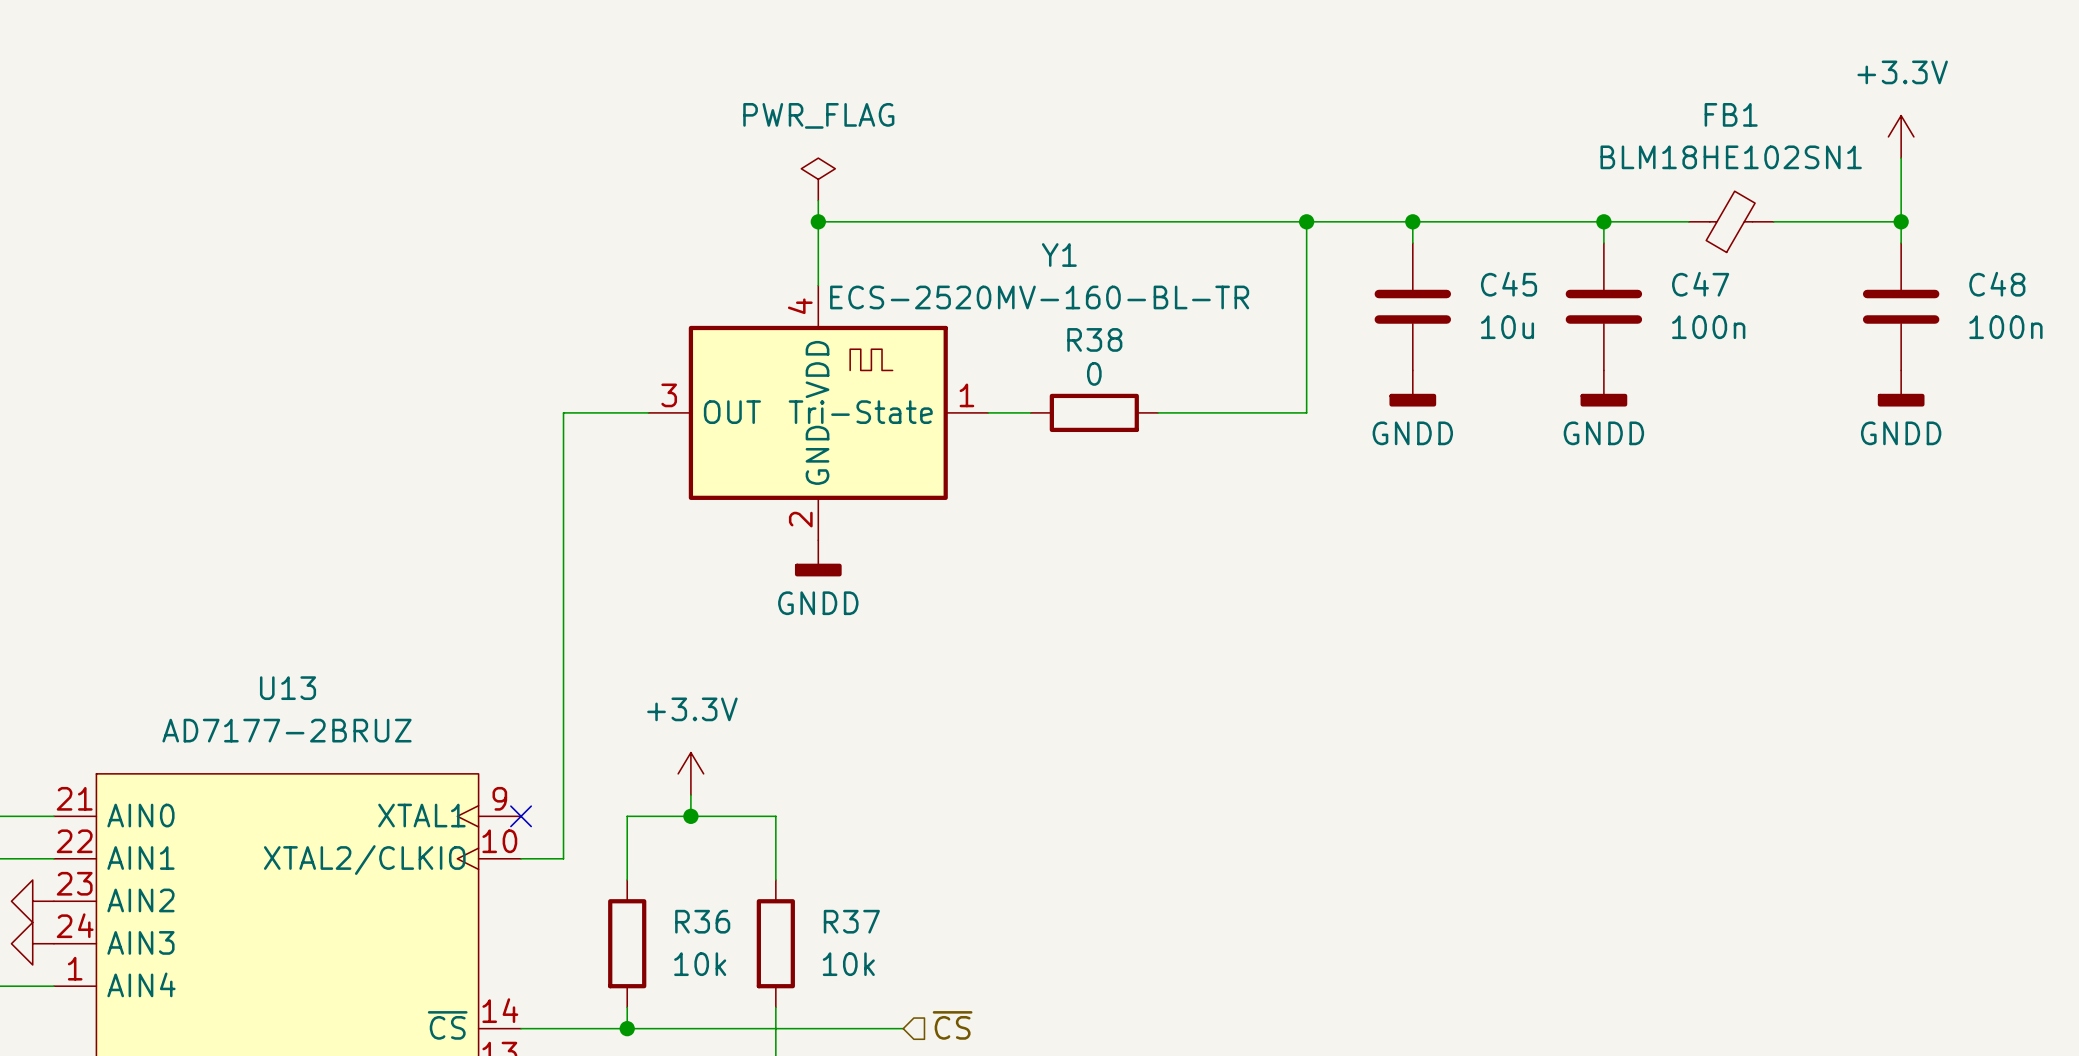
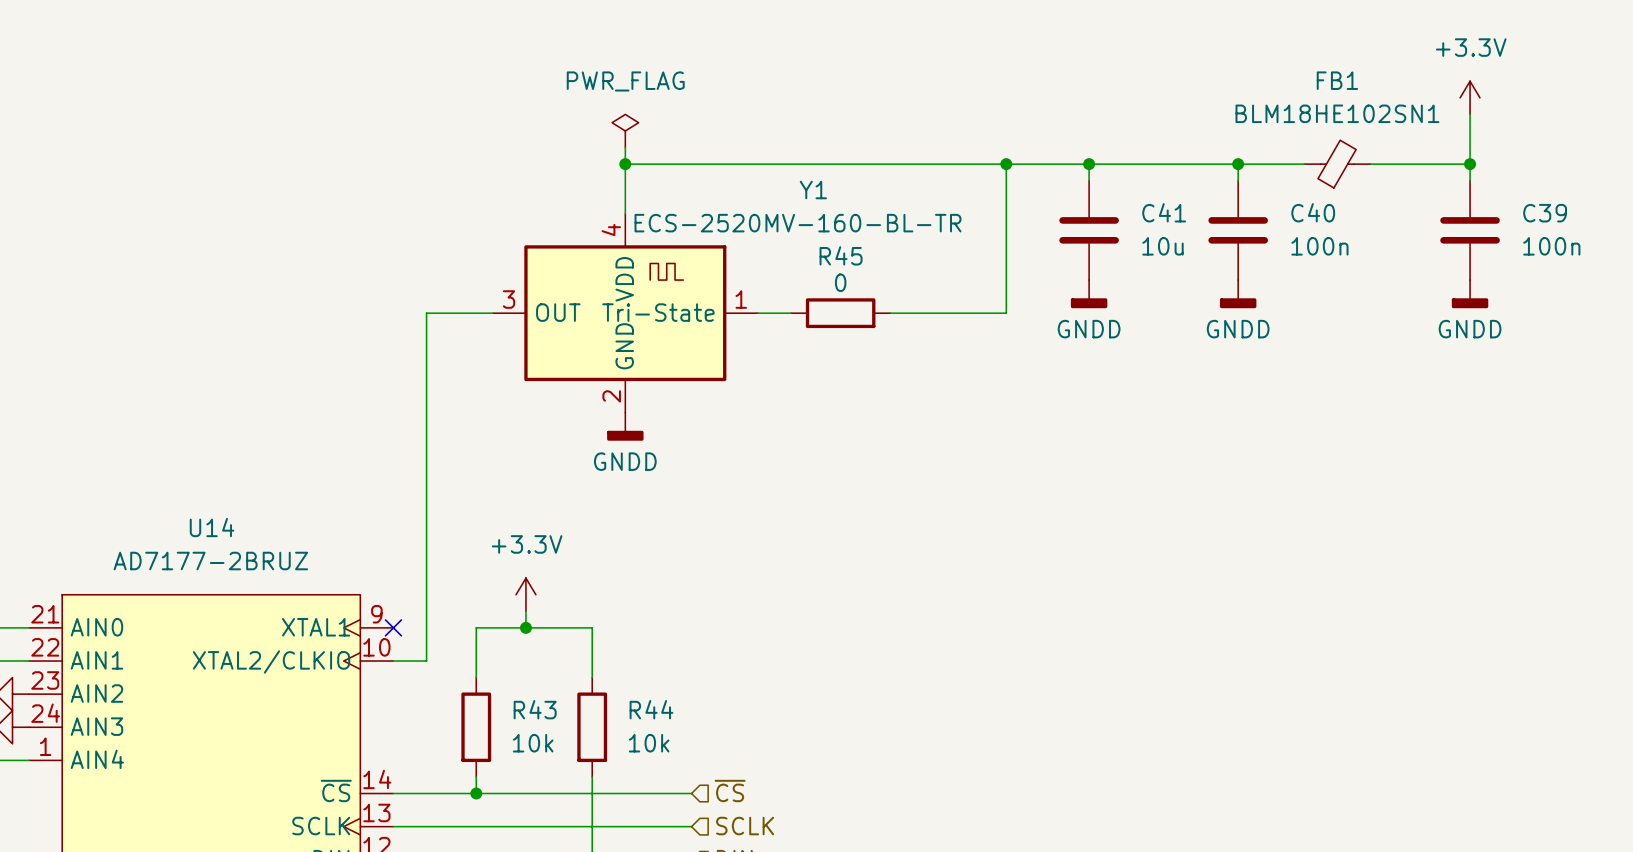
C45 name: C45 (1509, 284) -> C41 (1164, 212)
C47 name: C47 (1700, 284) -> C40 (1313, 212)
C48 name: C48 (1997, 284) -> C39 (1545, 213)
R38 name: R38 (1094, 339) -> R45 (841, 255)
U13 name: U13 (288, 688) -> U14 (212, 527)
R36 name: R36 (702, 921) -> R43 (535, 709)
R37 name: R37 (851, 921) -> R44 (651, 709)

